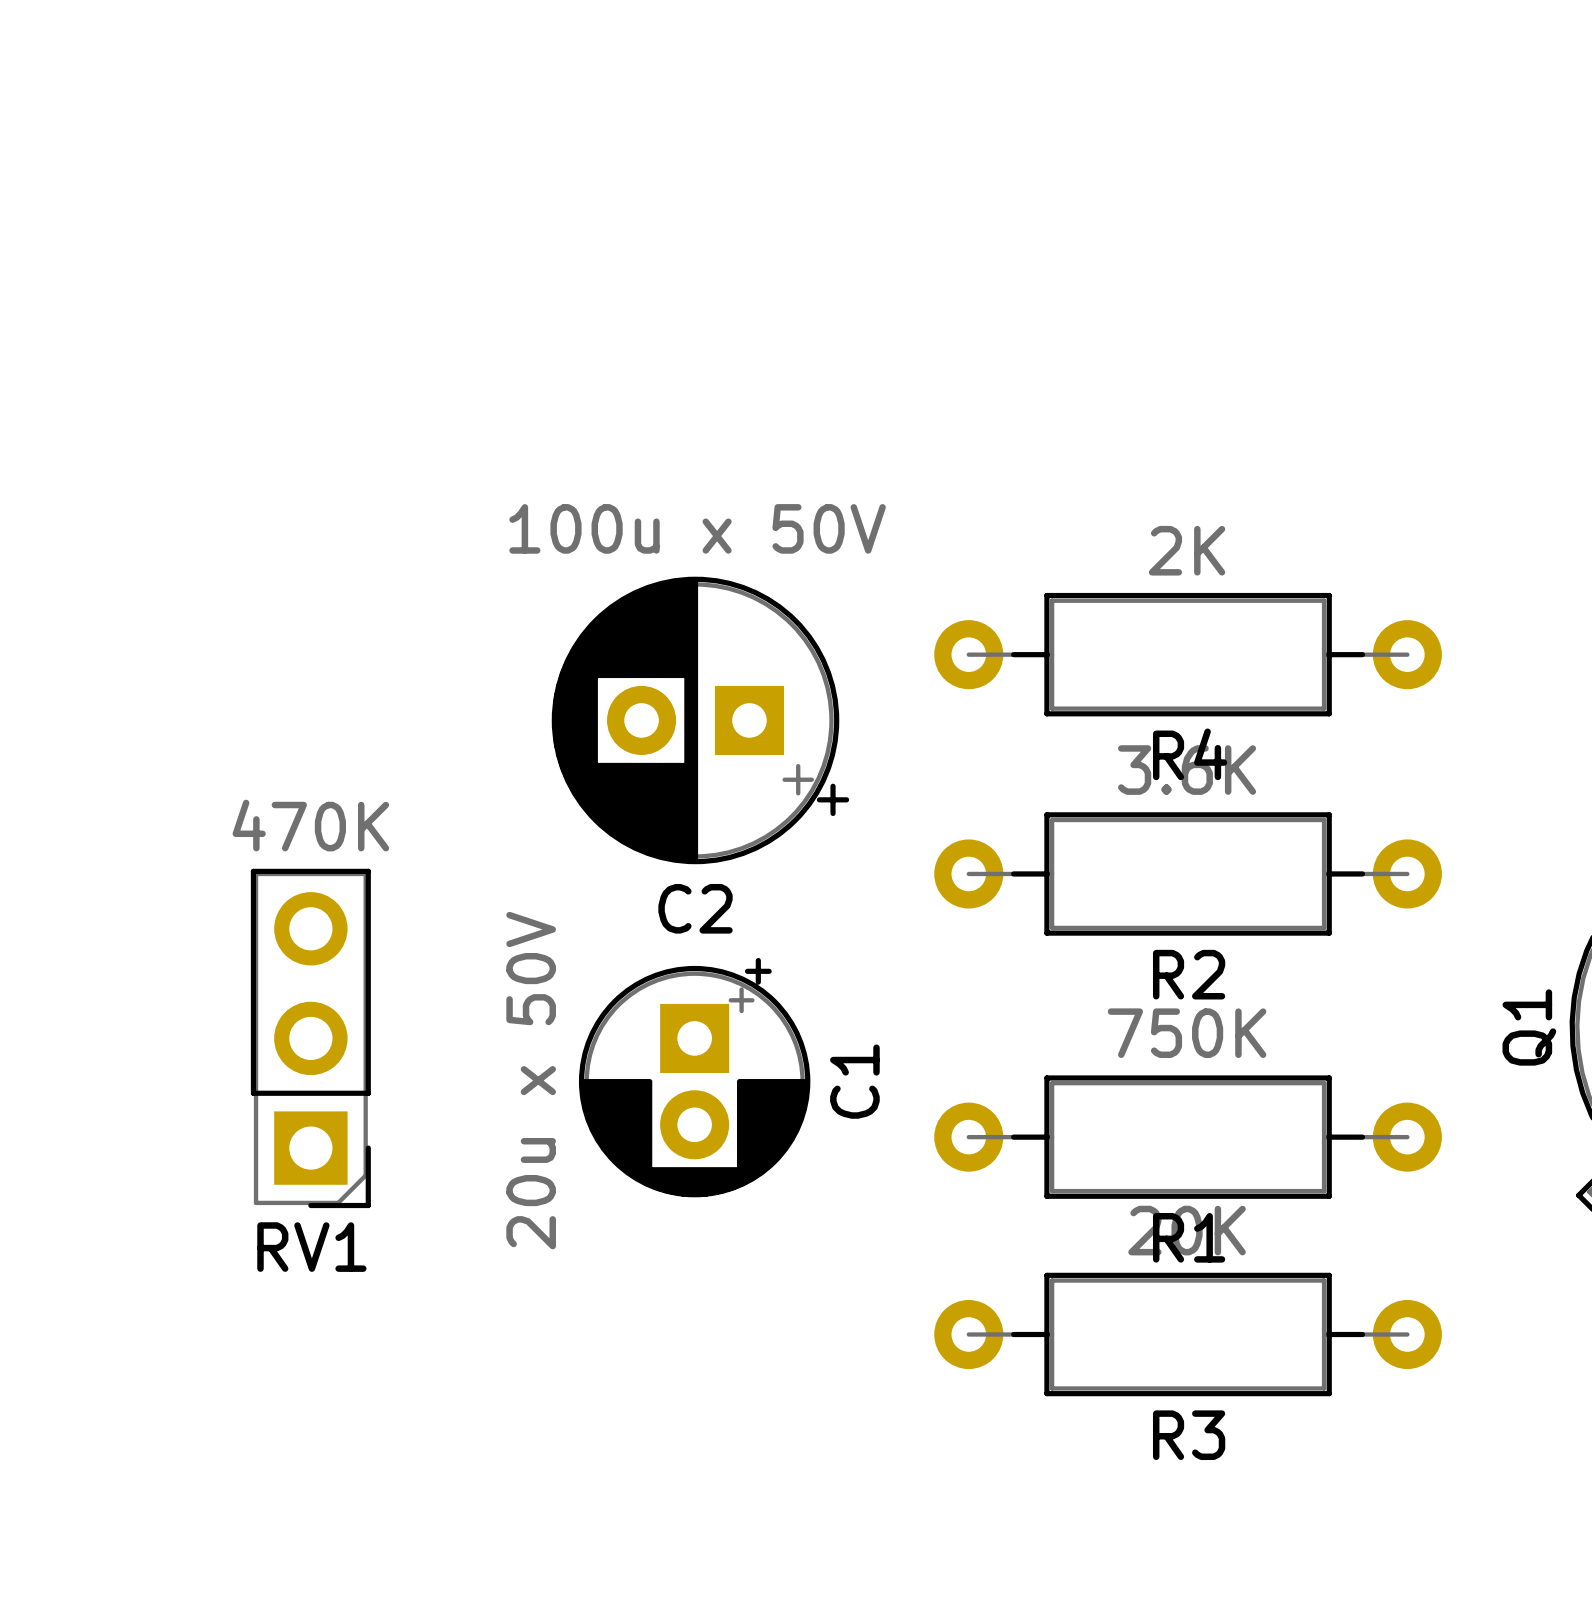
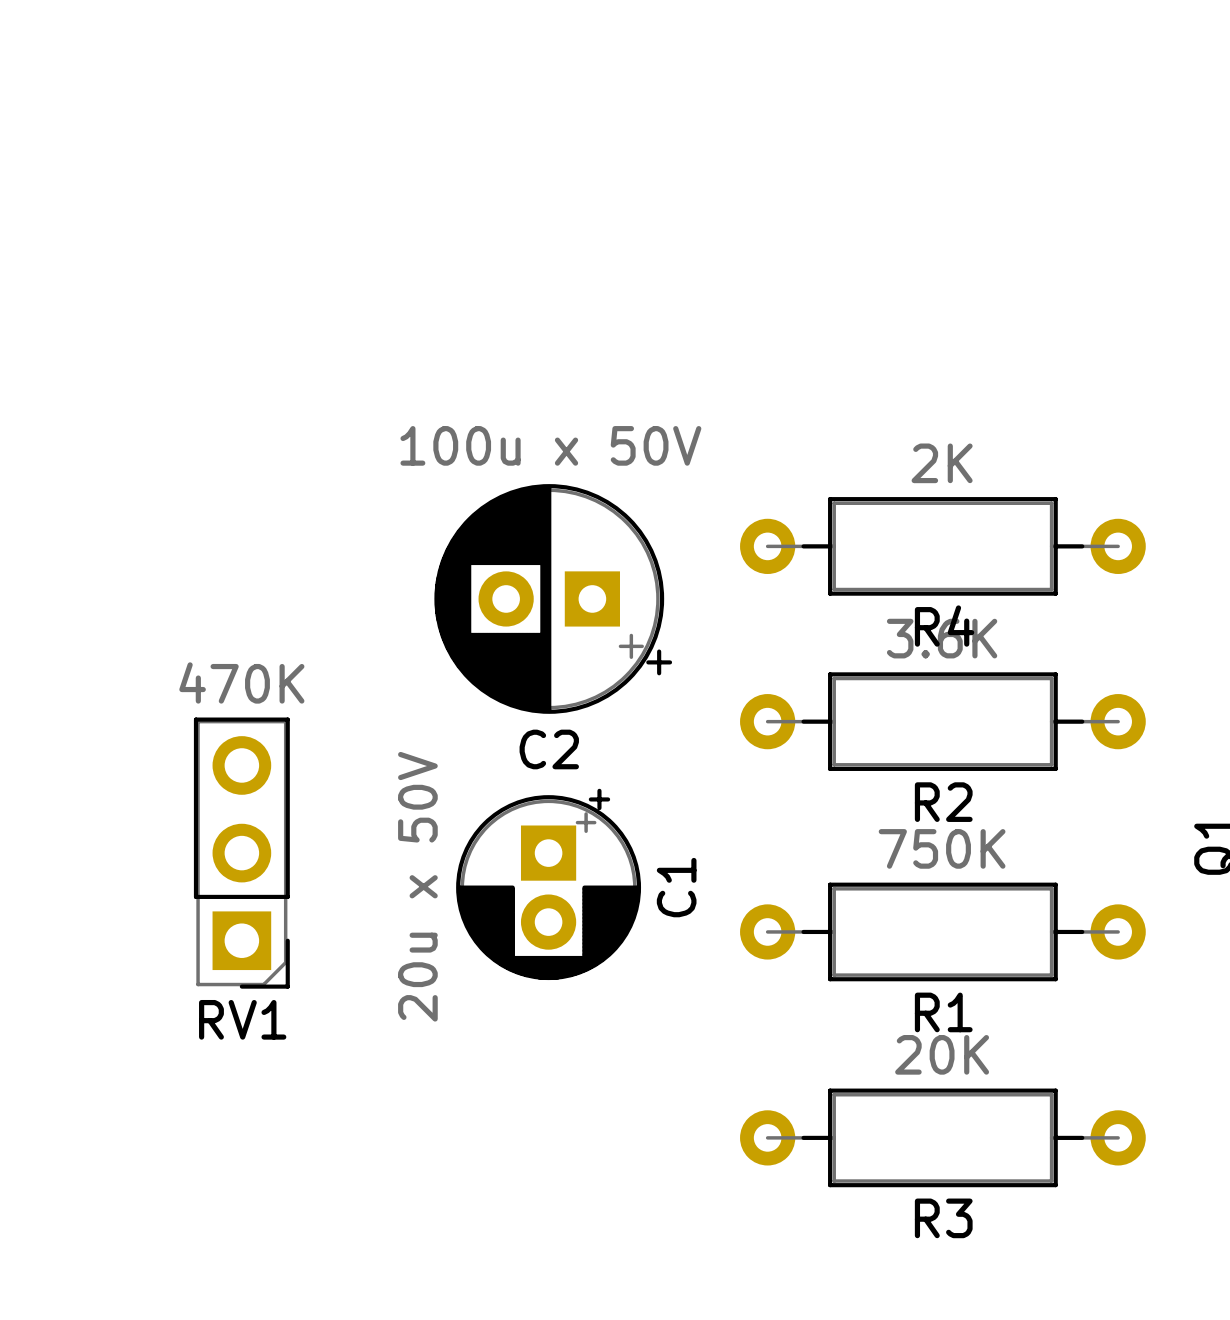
R3 position: (1188, 1334) -> (942, 1137)

